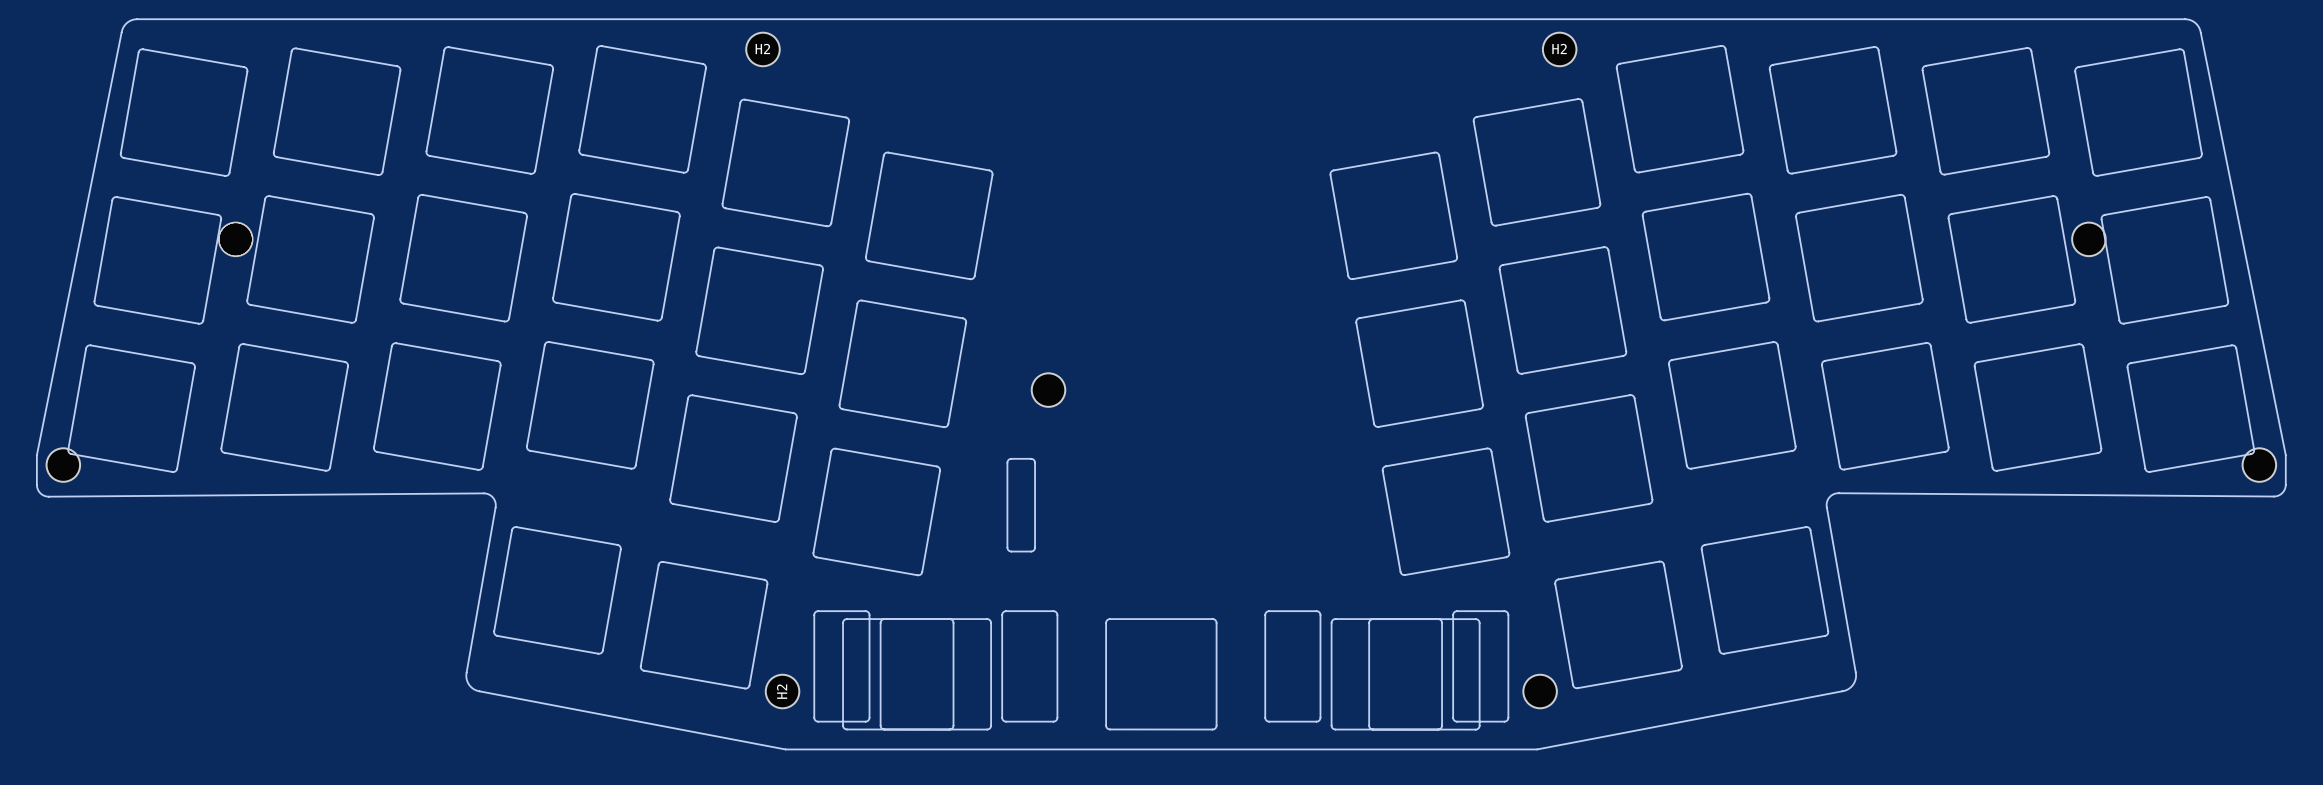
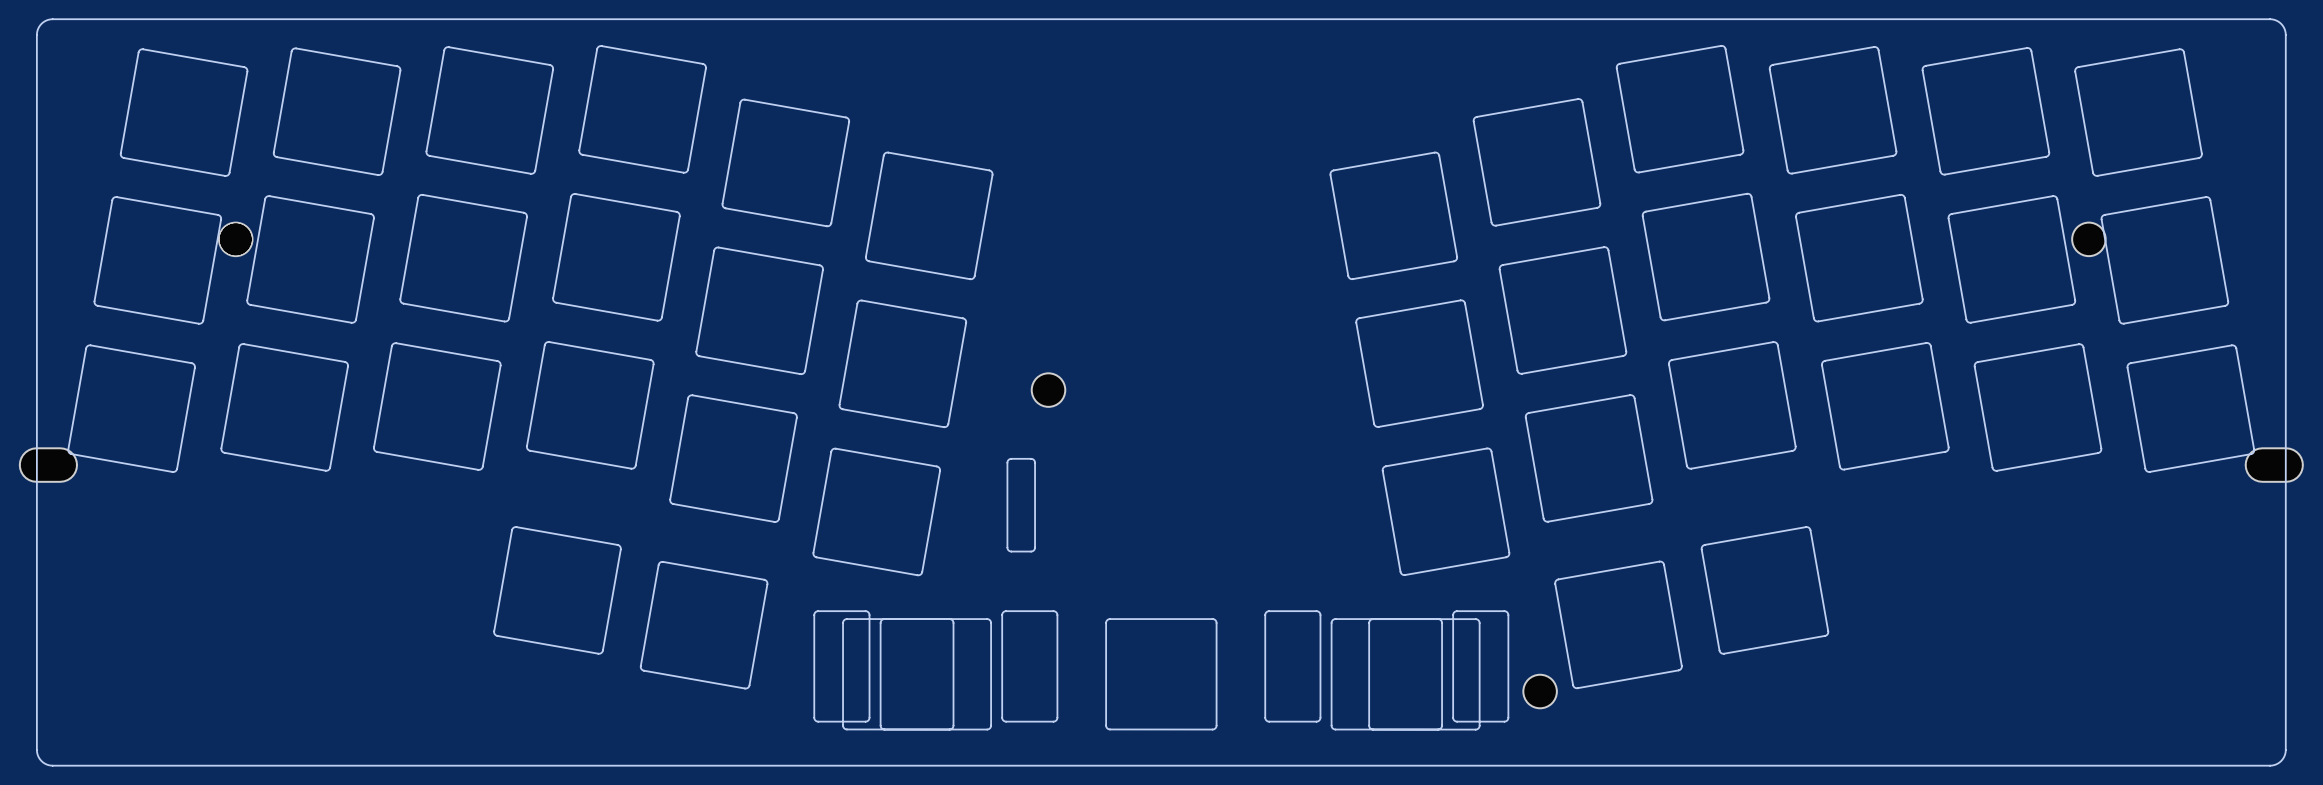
board edge: (137, 19) (126, 22) (122, 30) (36, 455) -> (137, 19) (50, 19) (41, 23) (37, 30) (36, 455)
board edge: (2185, 19) (2194, 21) (2200, 31) (2285, 455) -> (2185, 19) (2272, 19) (2281, 23) (2285, 30) (2285, 455)
H2: (762, 49) -> none
H2: (1559, 49) -> none
part: none -> (48, 465)
part: (63, 465) -> none
part: (2259, 465) -> none
part: none -> (2274, 465)
board edge: (2285, 484) (2282, 493) (2273, 496) (1834, 493) (1828, 498) (1826, 505) (1856, 674) (1854, 681) (1850, 687) (1844, 690) (1537, 749) (785, 749) (479, 691) (471, 687) (467, 681) (466, 674) (495, 506) (494, 498) (488, 494) (48, 496) (40, 493) (36, 484) -> (2285, 484) (2285, 749) (2281, 761) (2270, 765) (50, 765) (40, 759) (36, 749) (36, 484)
H2: (782, 691) -> none

